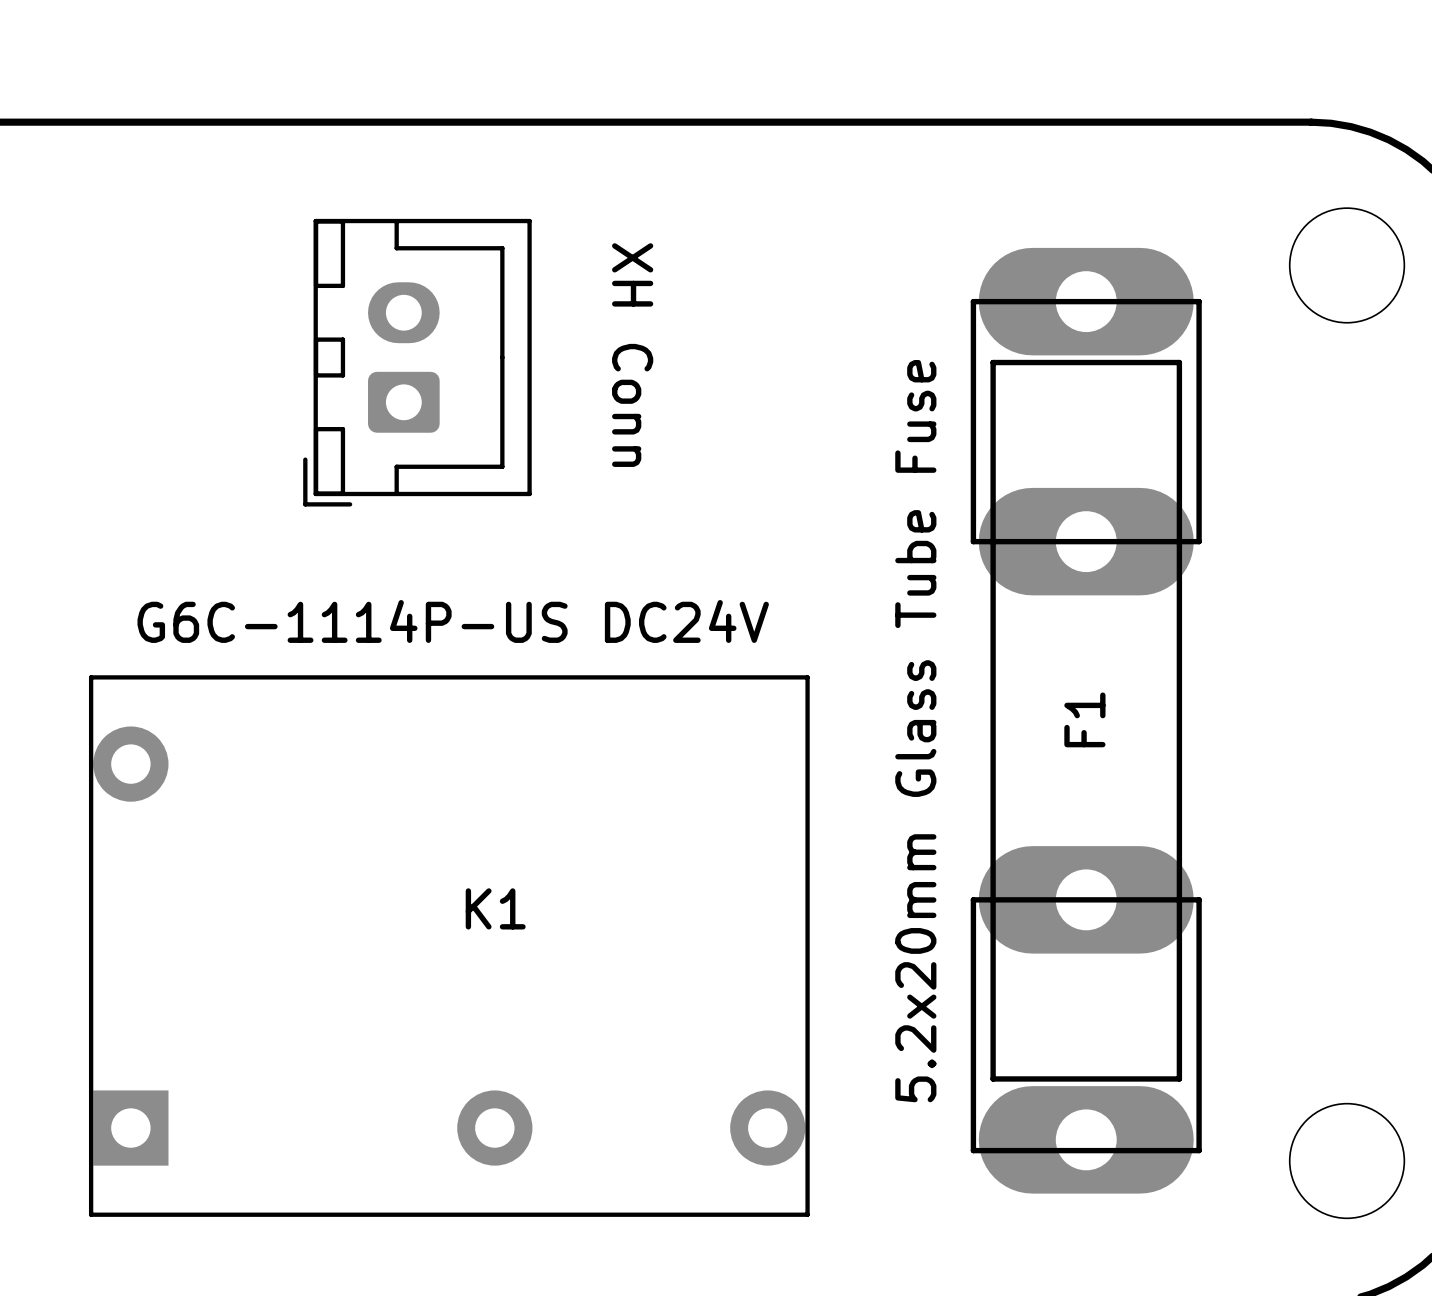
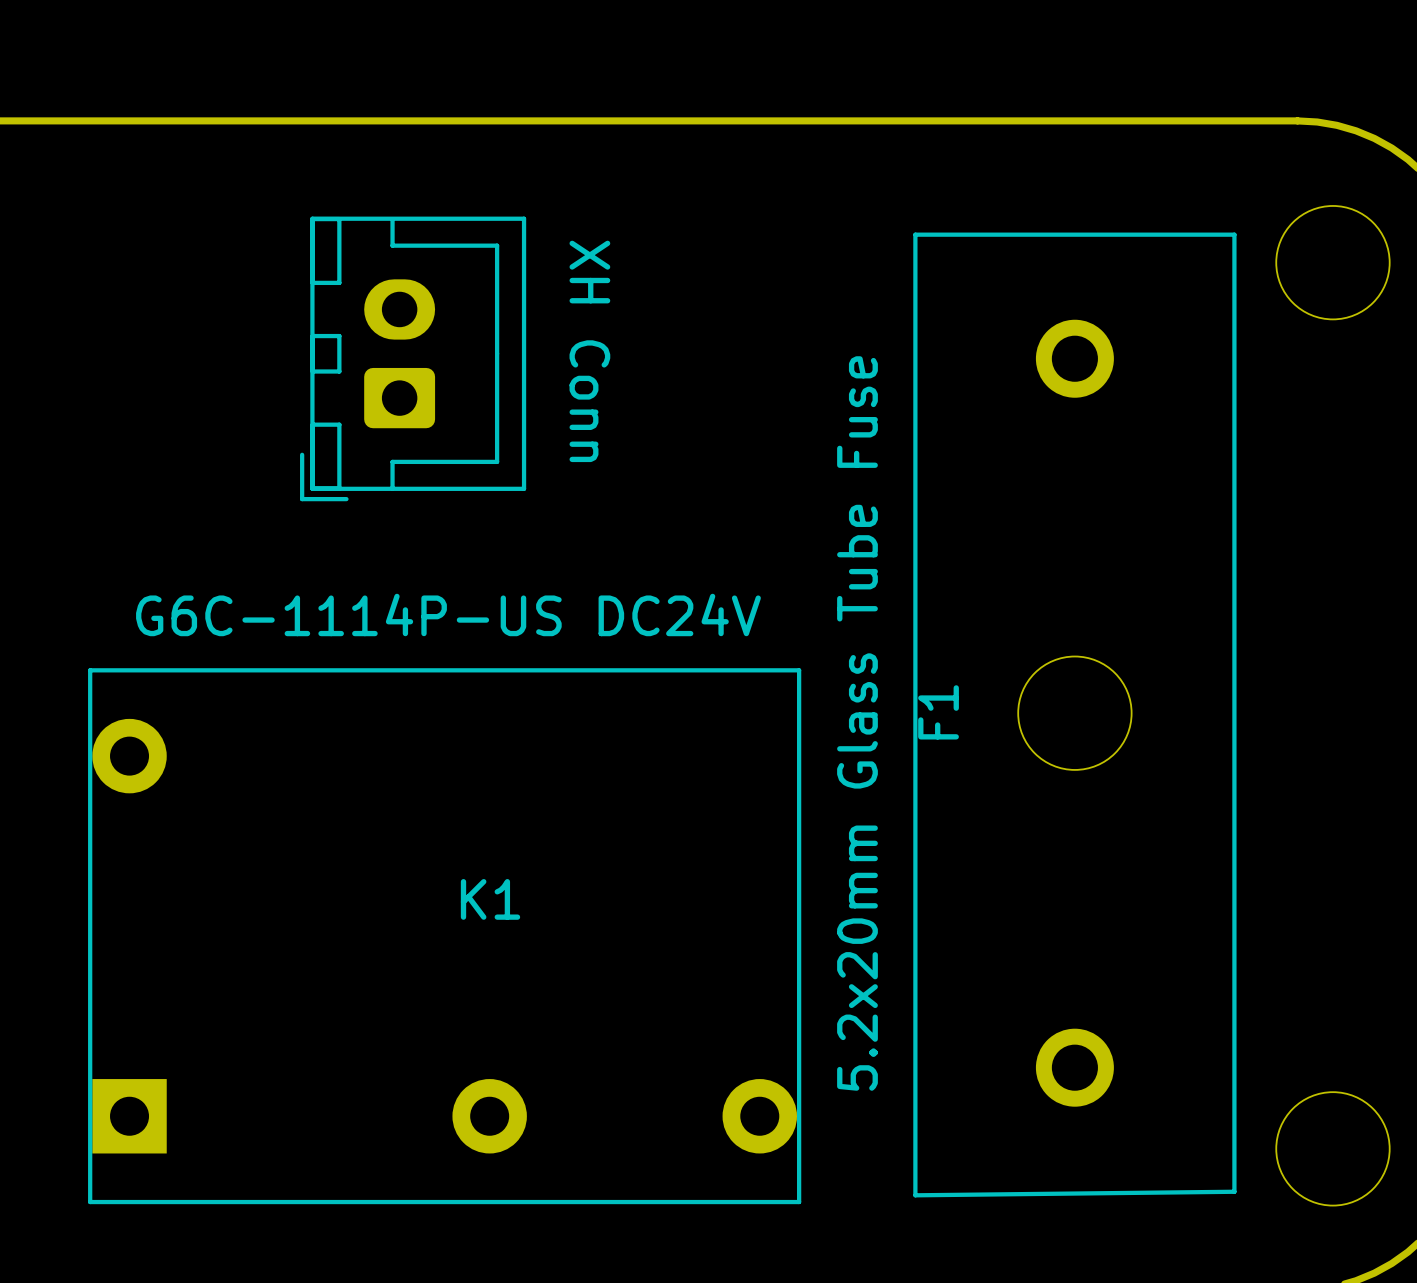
F1 footprint: [970, 247, 1202, 1194] -> [913, 232, 1237, 1198]
text position: XH Conn (632, 355) -> XH Conn (589, 351)
F1 name position: F1 (1084, 719) -> F1 (938, 712)
text position: 5.2x20mm Glass Tube Fuse (915, 731) -> 5.2x20mm Glass Tube Fuse (857, 723)

